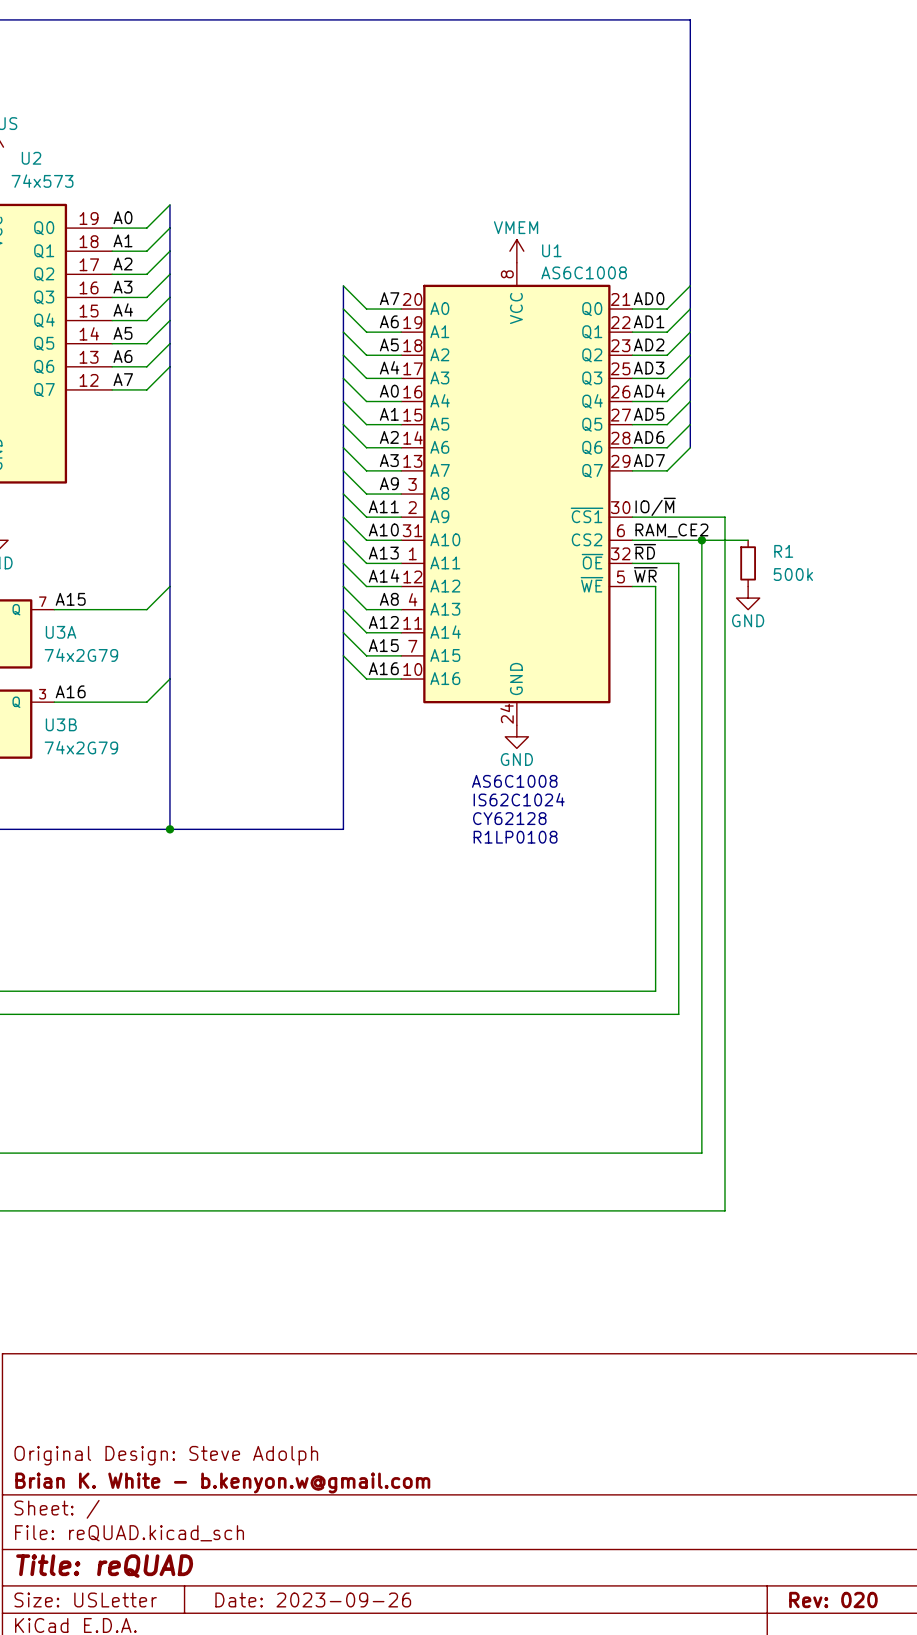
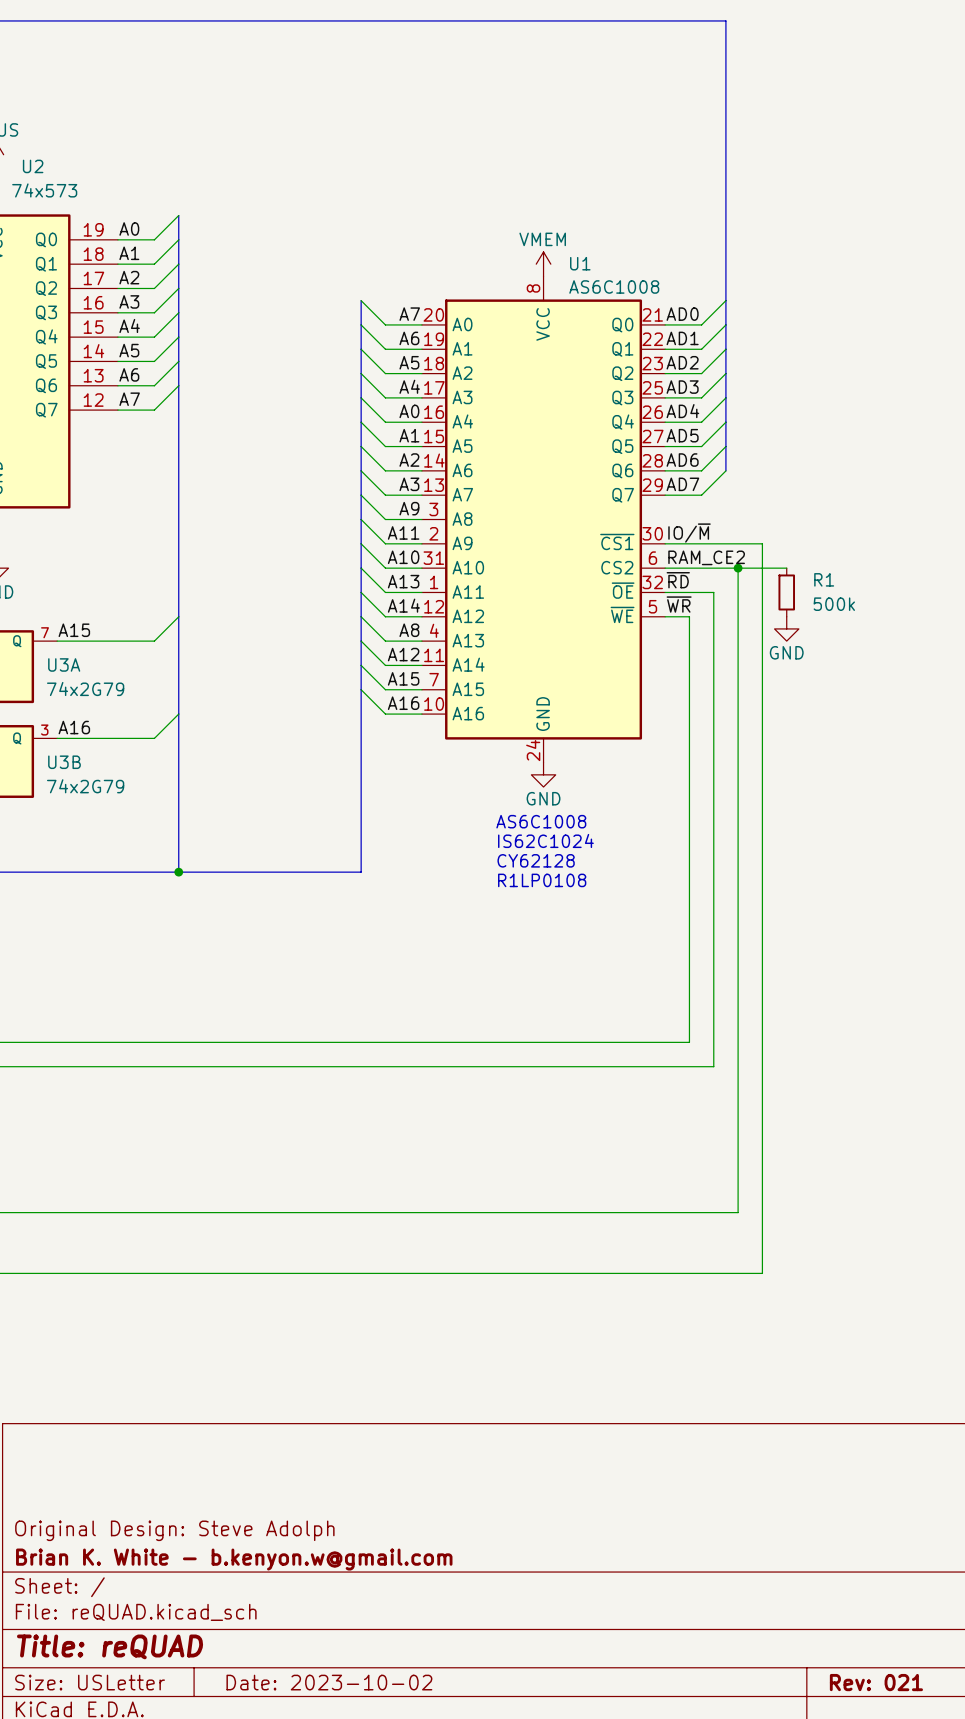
title block: Date: 2023-09-26 (313, 1599) -> Date: 2023-10-02 (329, 1682)
title block: Rev: 020 (833, 1599) -> Rev: 021 (876, 1682)

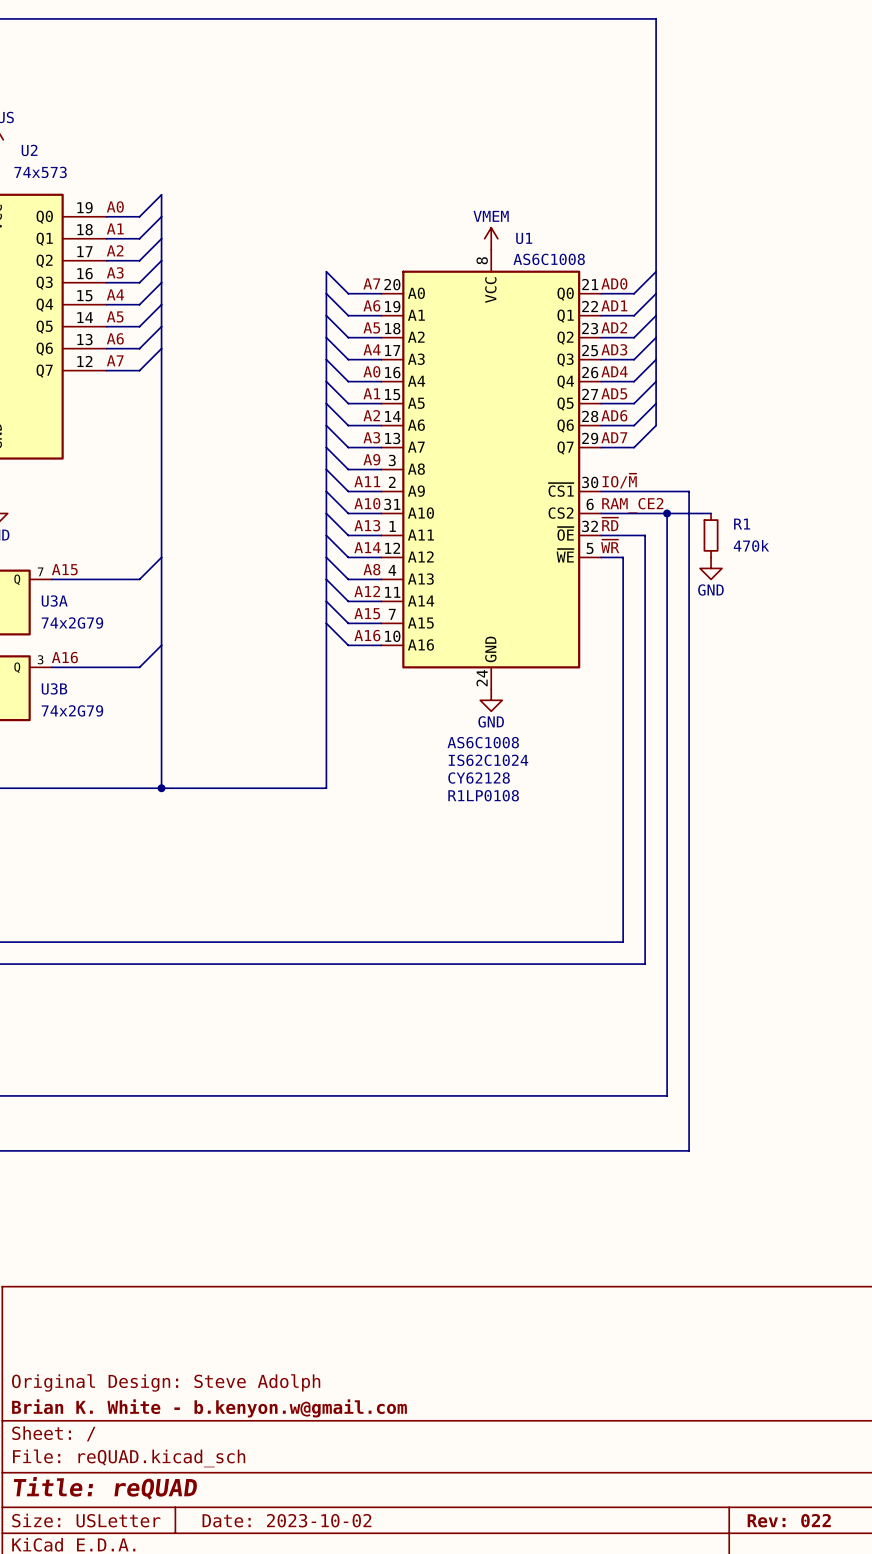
R1 value: 500k (834, 604) -> 470k (751, 545)
title block: Rev: 021 (876, 1682) -> Rev: 022 (789, 1520)

